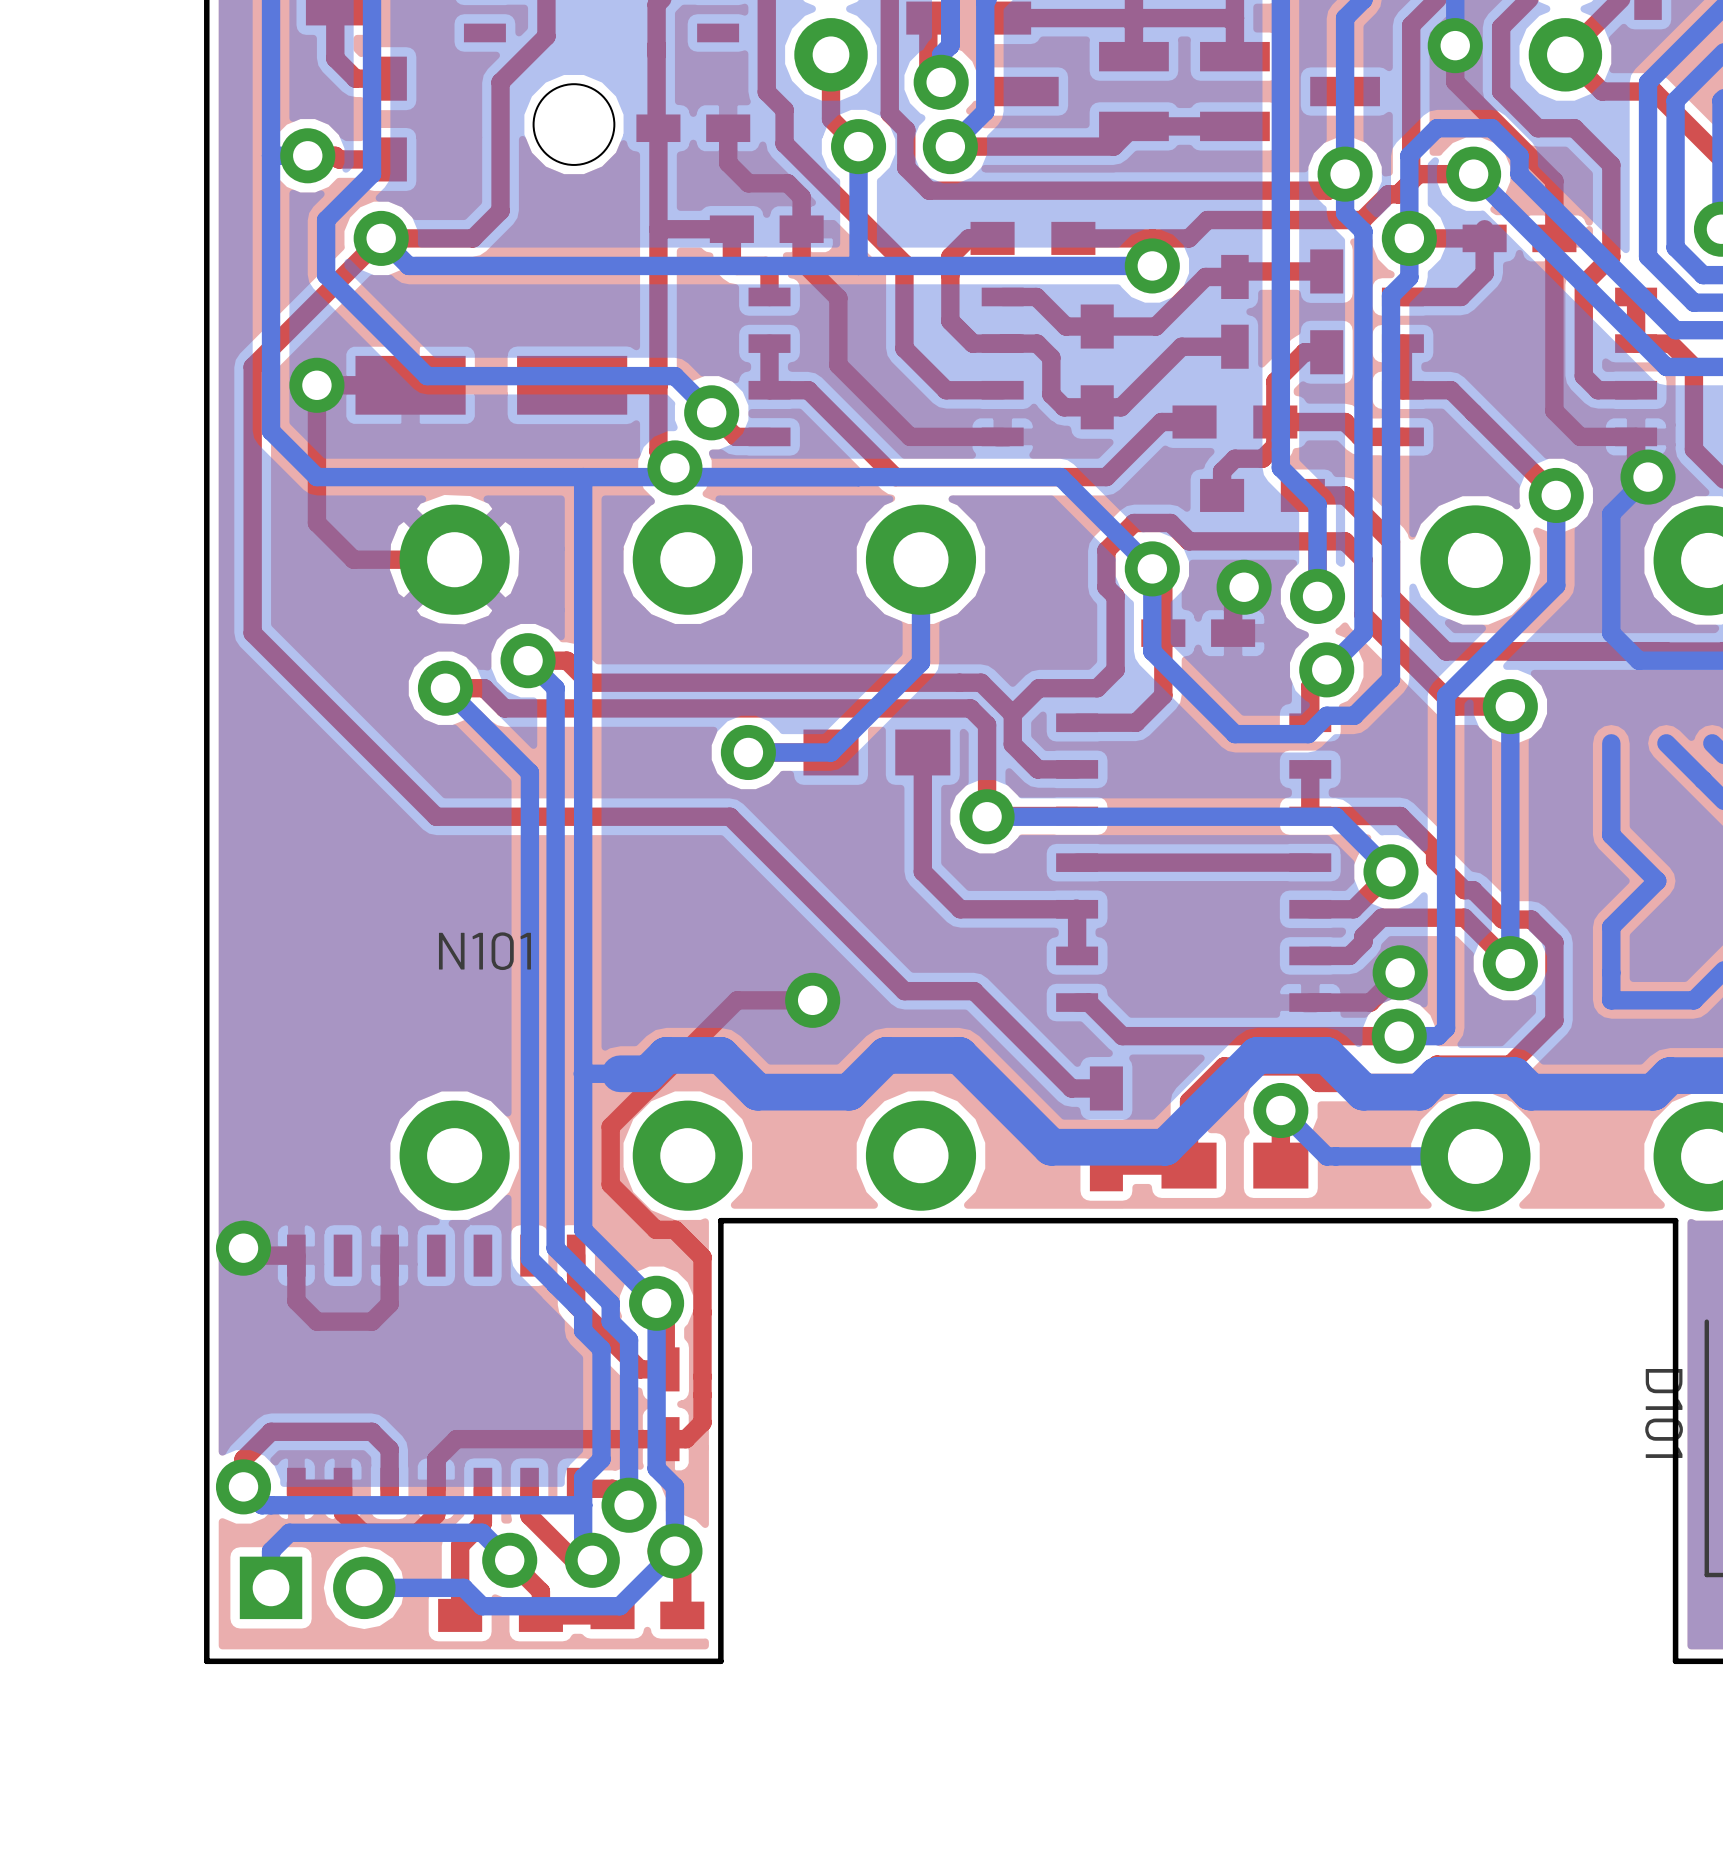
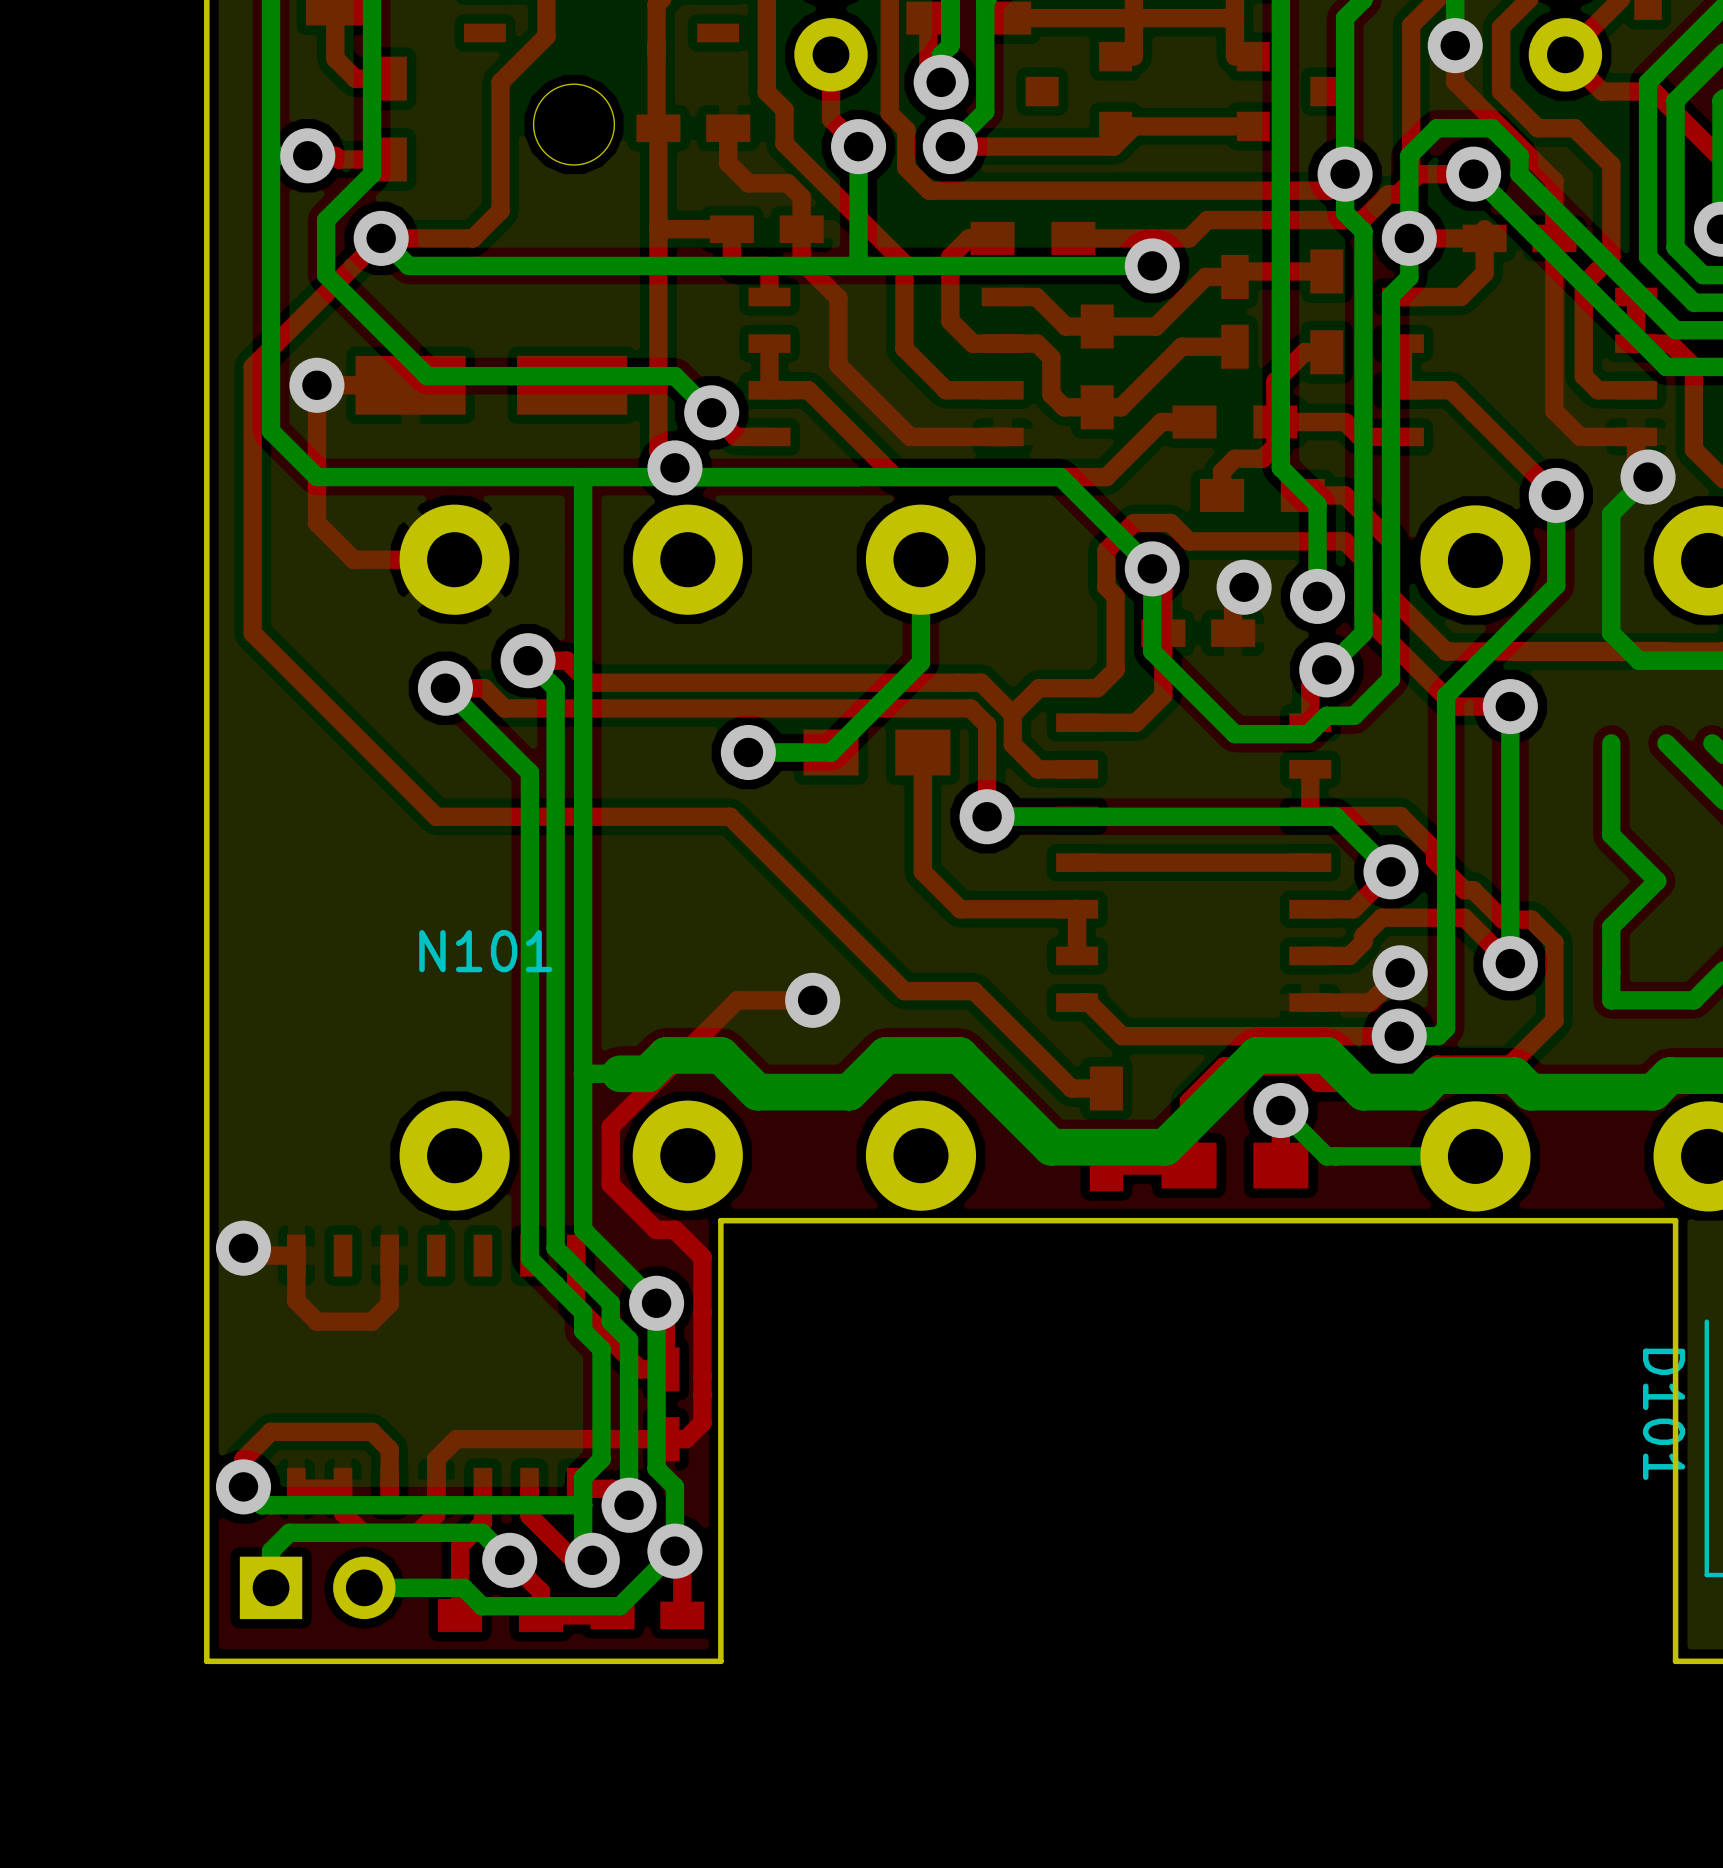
part footprint: [988, 41, 1169, 142] -> [1025, 41, 1133, 142]
part footprint: [1200, 41, 1380, 142] -> [1236, 41, 1344, 142]

